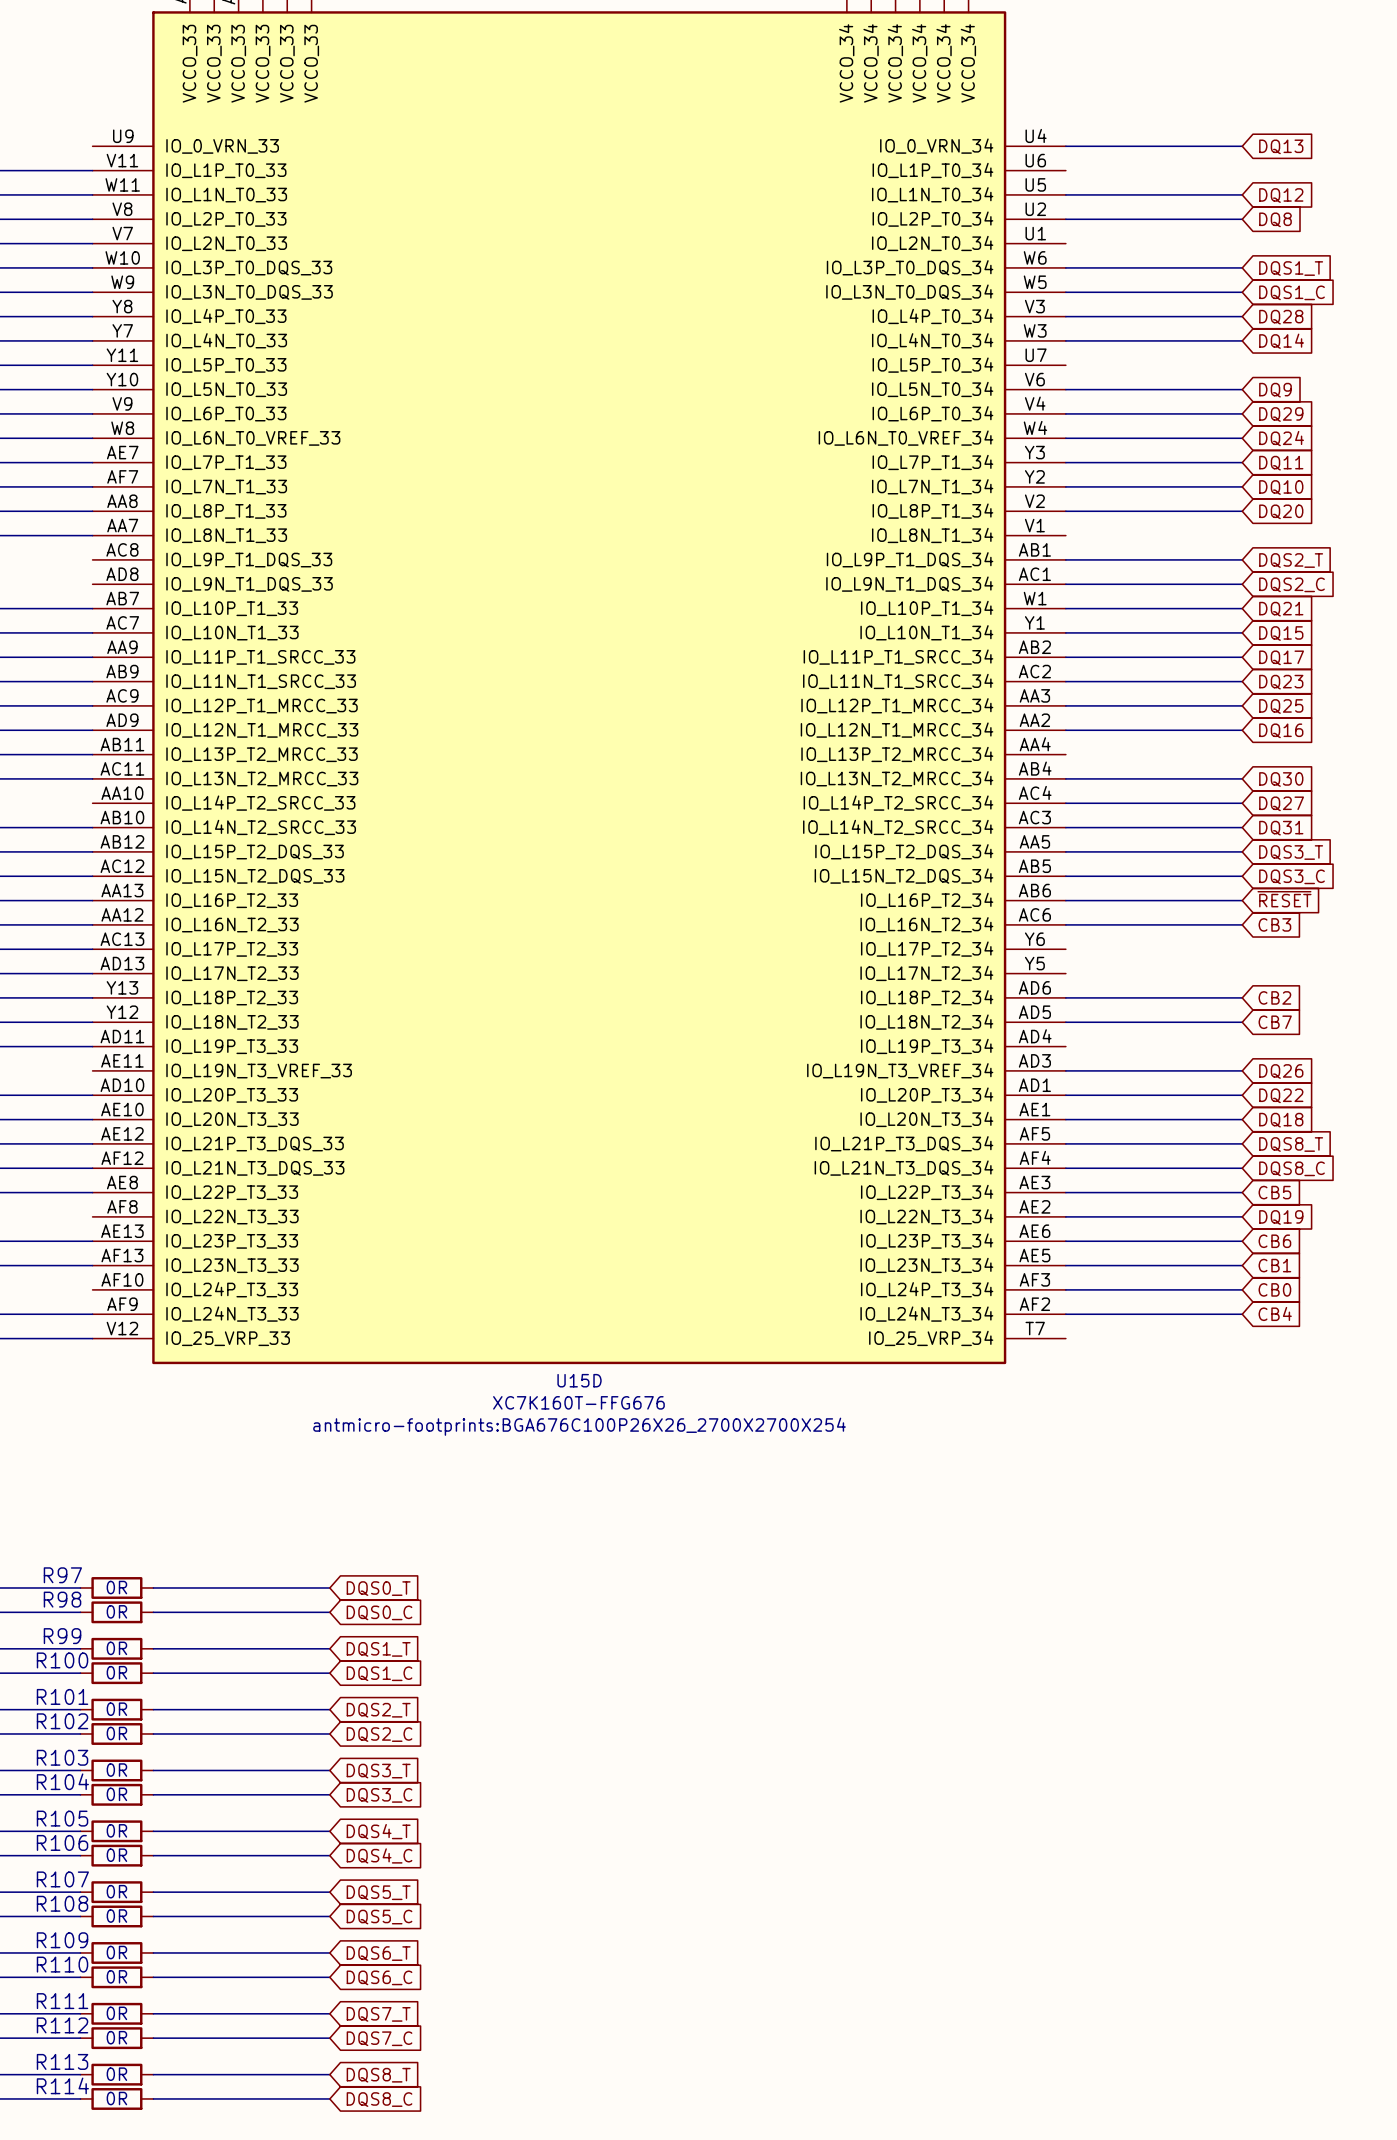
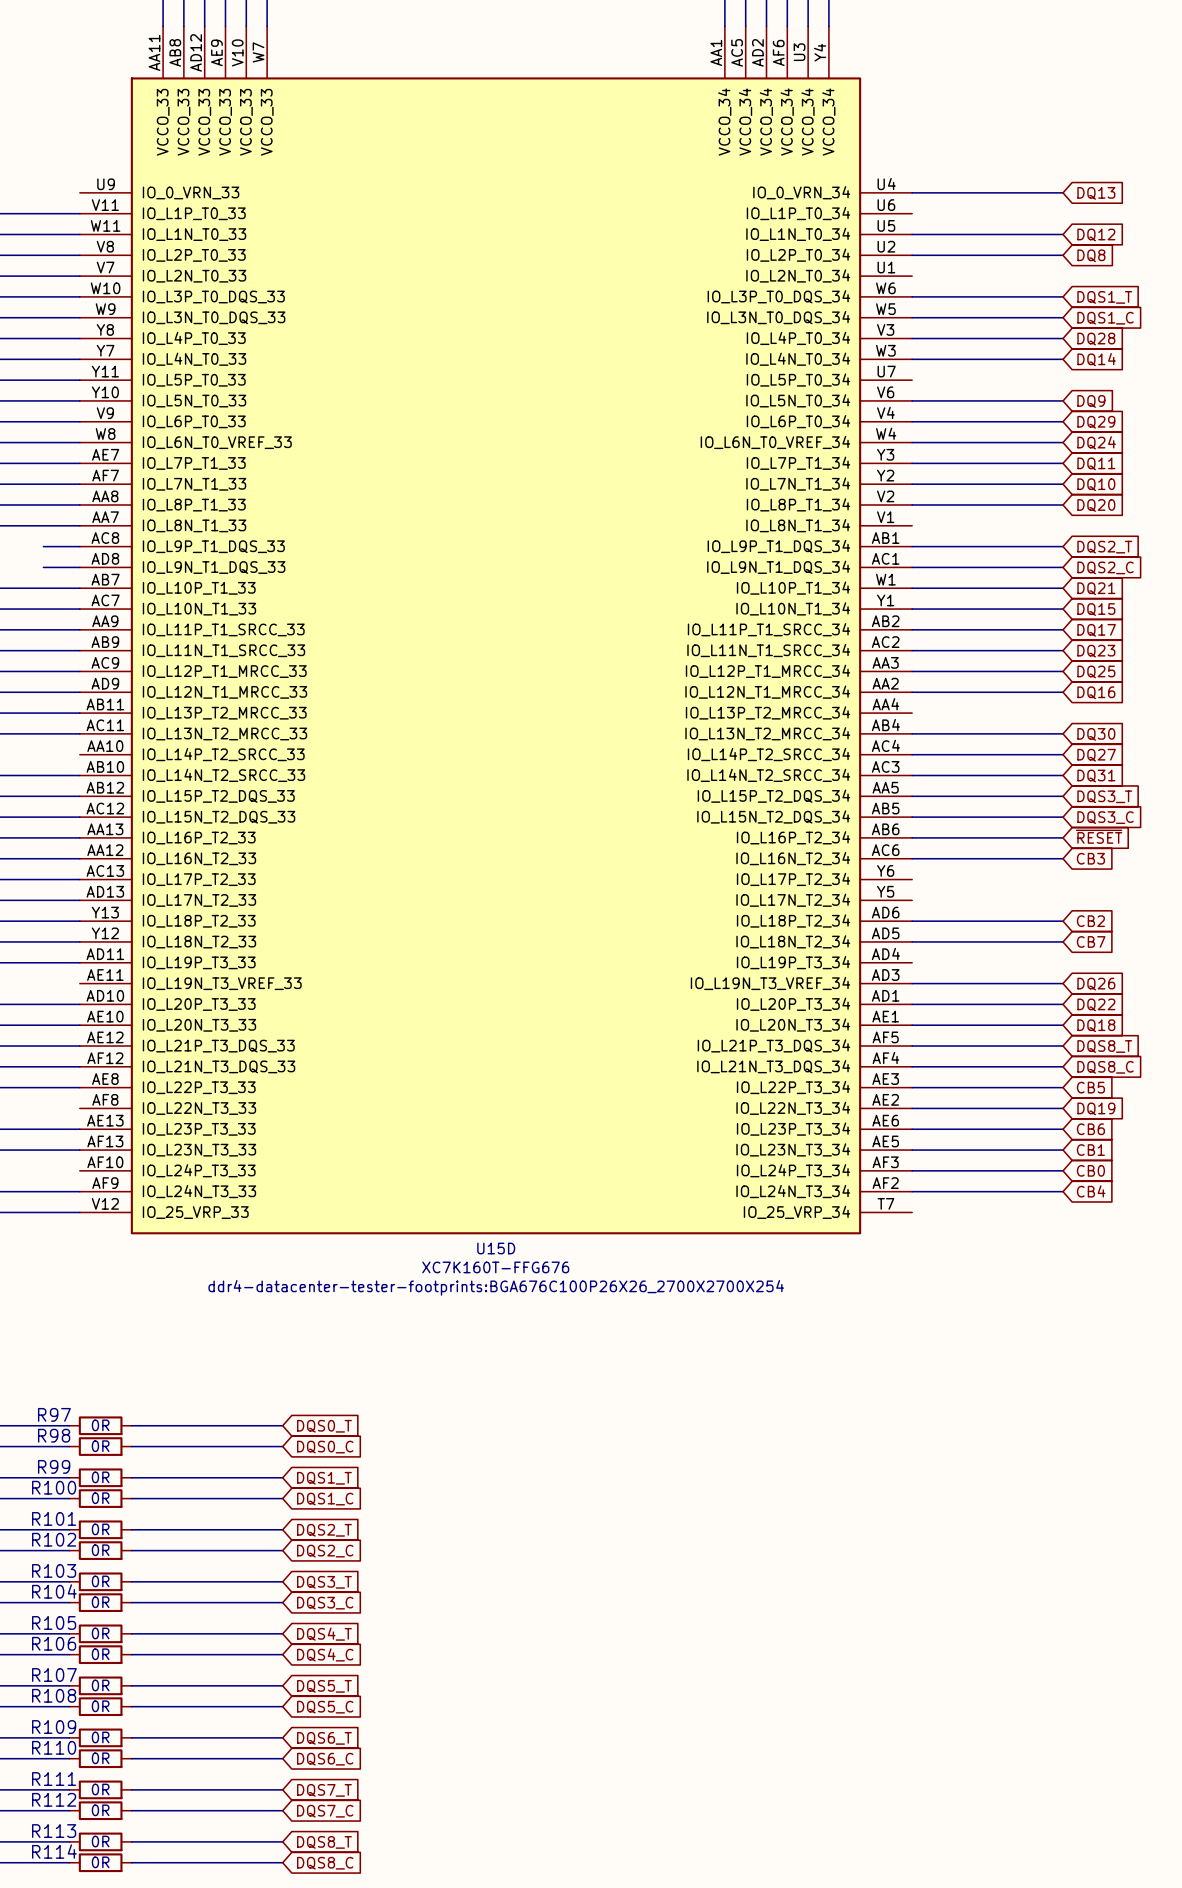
wire: none -> (43, 546) (79, 546)
wire: none -> (43, 567) (79, 567)
U15D text: antmicro-footprints:BGA676C100P26X26_2700X2700X254 (579, 1426) -> ddr4-datacenter-tester-footprints:BGA676C100P26X26_2700X2700X254 (496, 1287)

